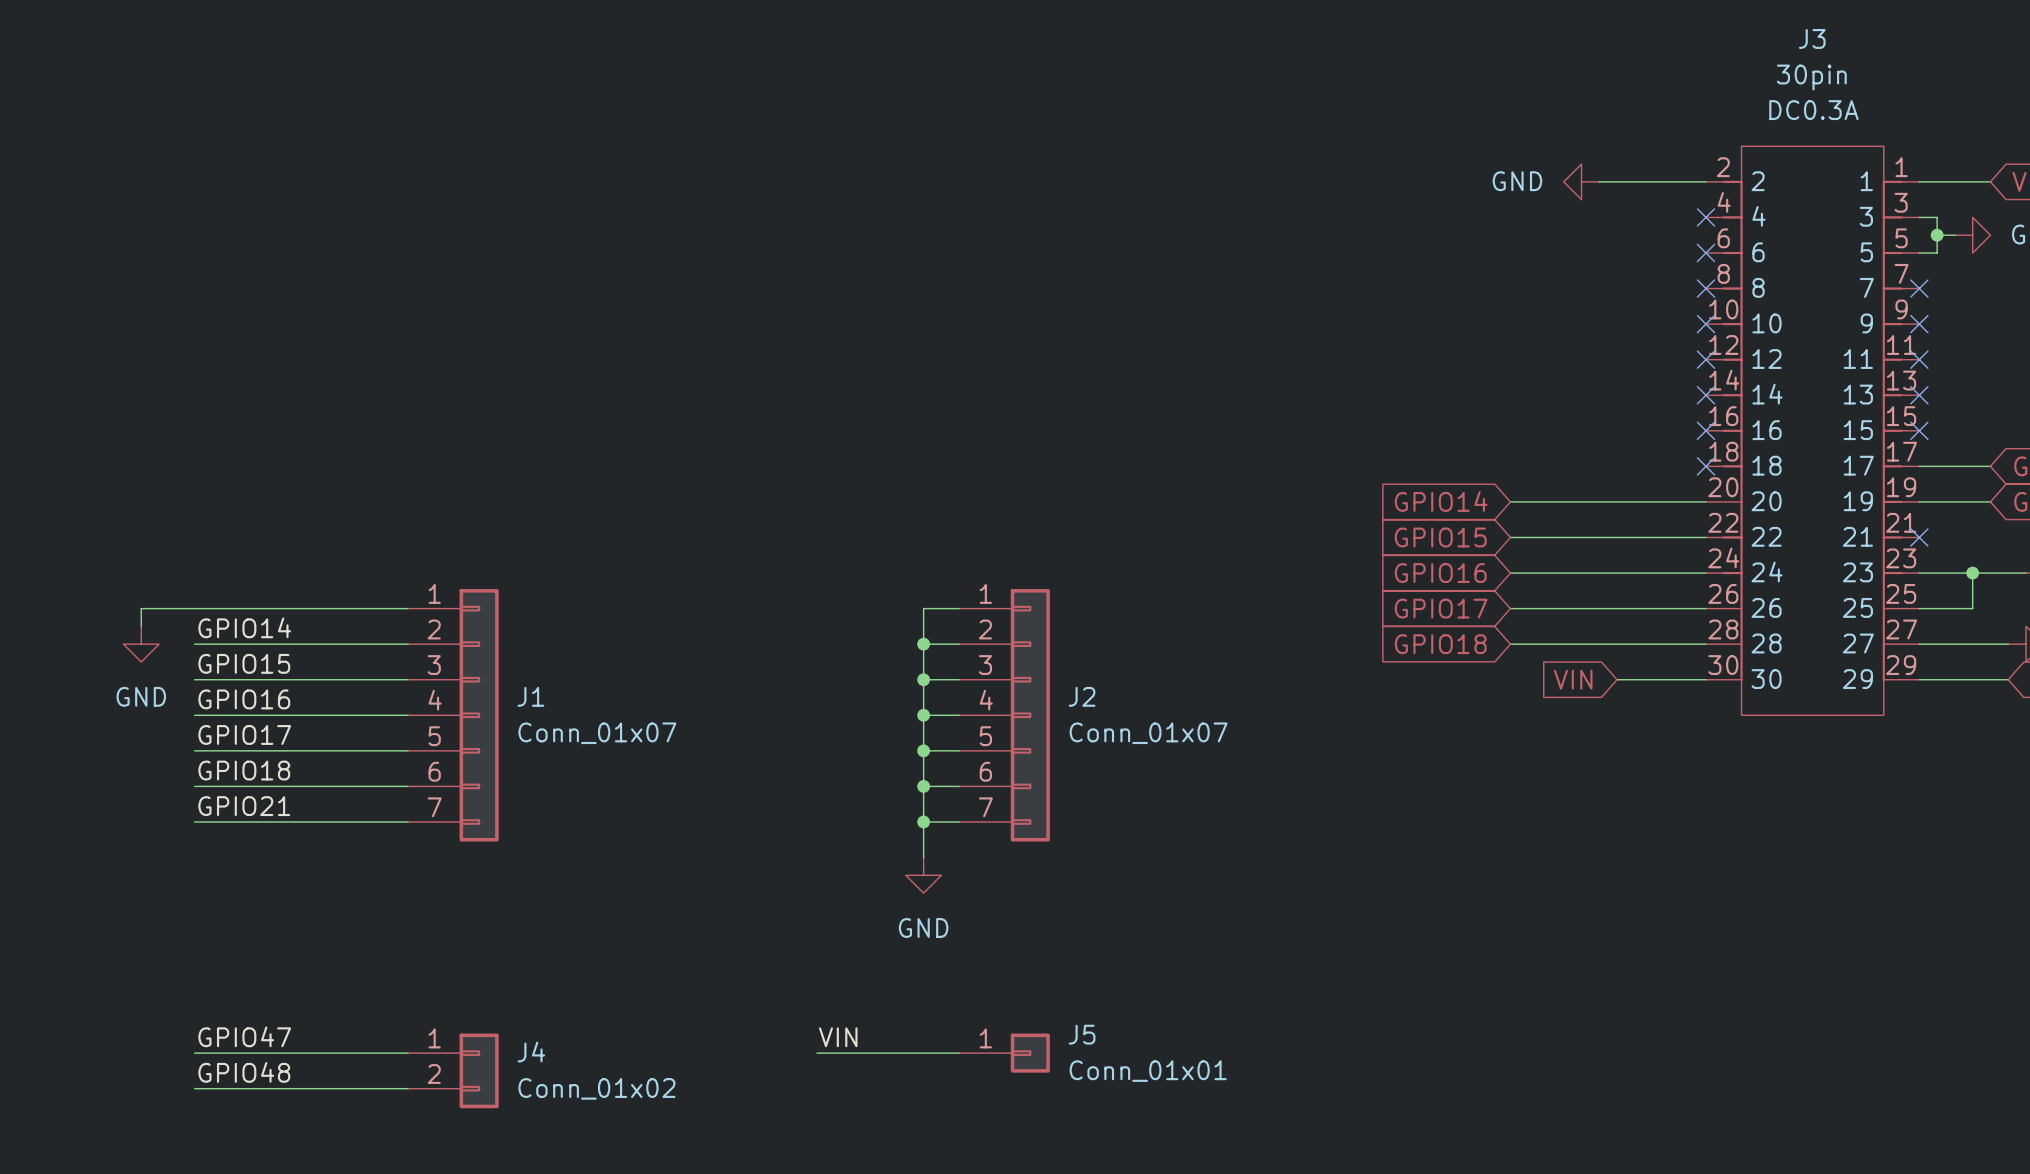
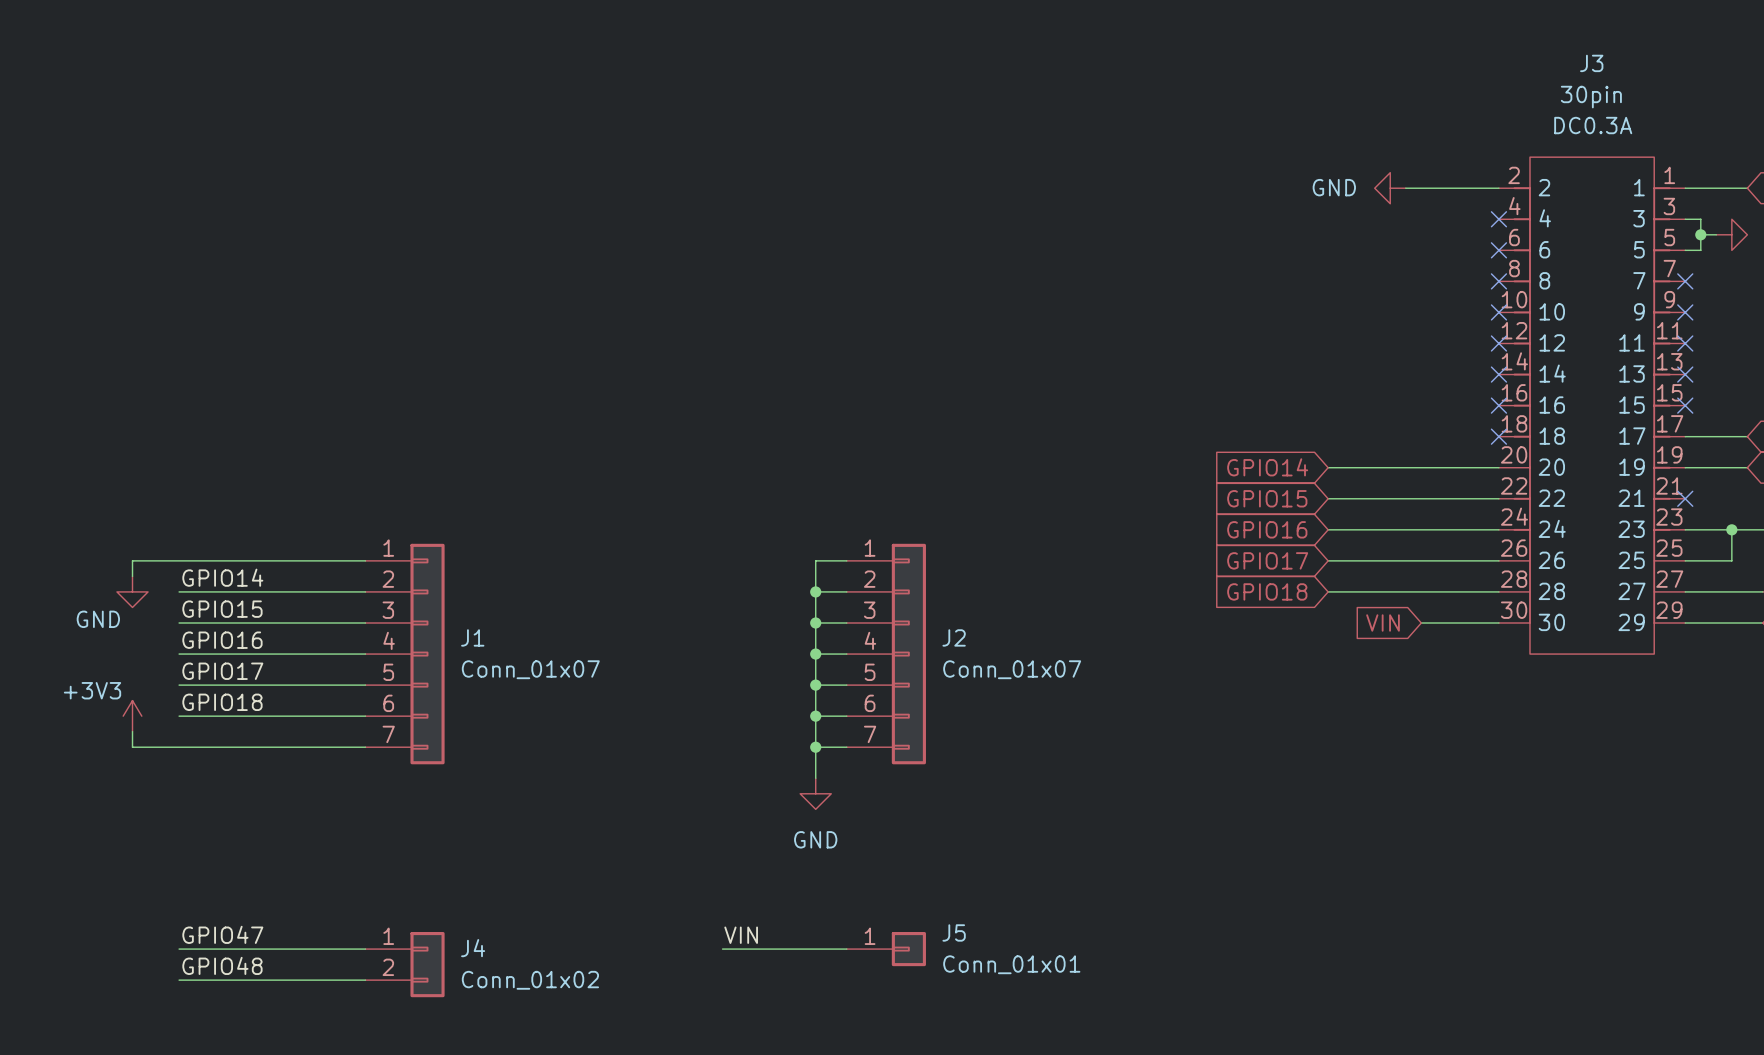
power symbol text position: GND (141, 696) -> GND (98, 619)
power symbol: none -> +3V3 (132, 716)
wire: none -> (132, 731) (132, 747) (179, 747)
label: GPIO21 (244, 806) -> none

